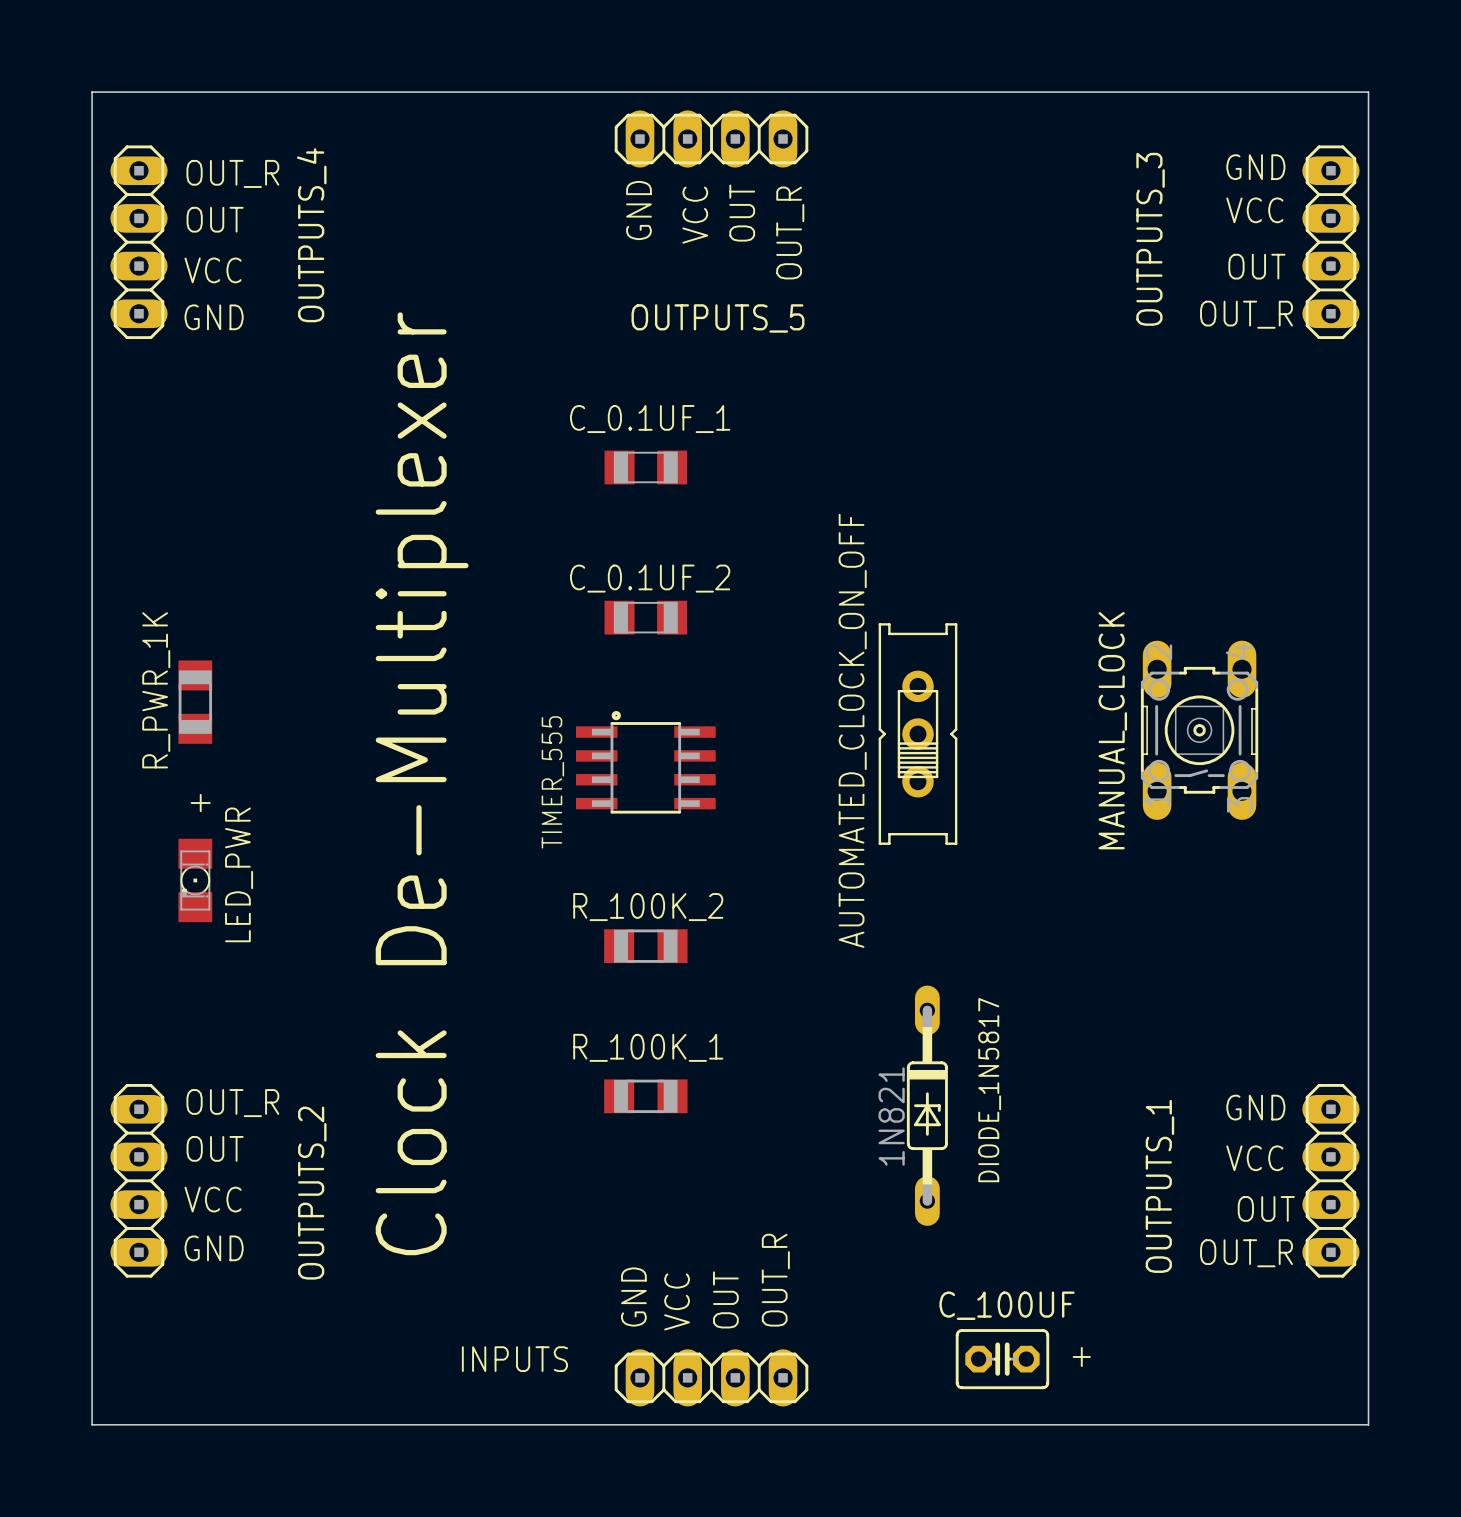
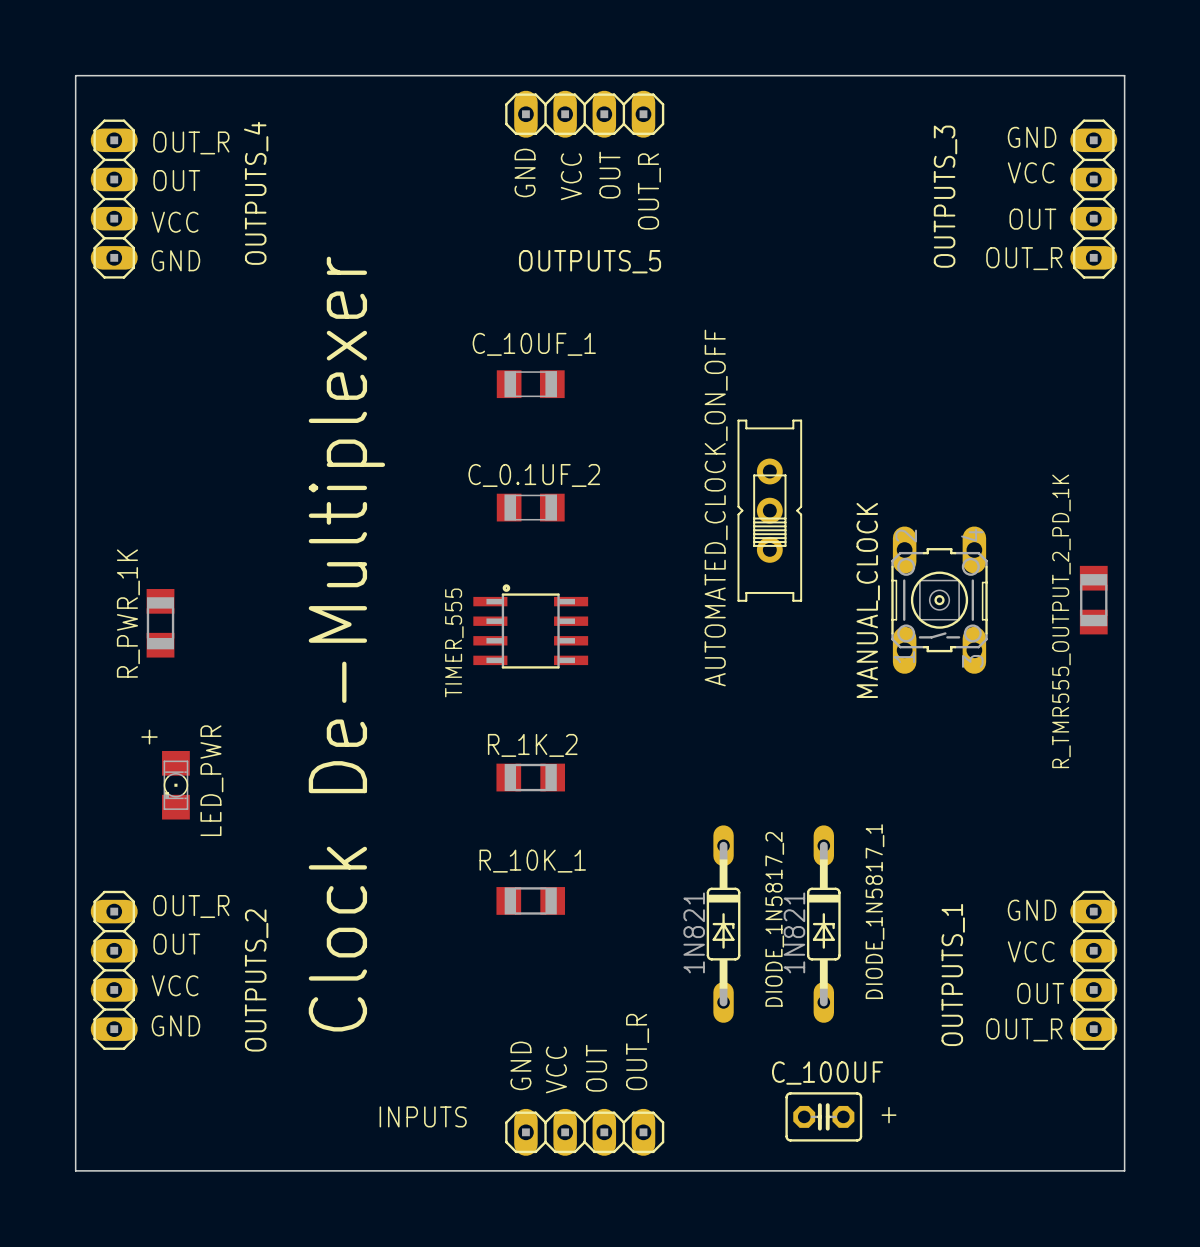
C_0.1UF_1 name: C_0.1UF_1 (650, 419) -> C_10UF_1 (534, 344)
R_PWR_1K position: (195, 702) -> (160, 623)
MANUAL_CLOCK position: (1199, 730) -> (939, 600)
R_TMR555_OUTPUT_2_PD_1K: none -> (1093, 600)
AUTOMATED_CLOCK_ON_OFF position: (918, 734) -> (769, 510)
text position: + (200, 803) -> + (149, 737)
LED_PWR position: (195, 880) -> (175, 785)
R_100K_2 name: R_100K_2 (648, 907) -> R_1K_2 (532, 745)
R_100K_1 name: R_100K_1 (648, 1047) -> R_10K_1 (532, 861)
DIODE_1N5817: 1N821 (927, 1105) -> none
DIODE_1N5817_2: none -> 1N821 (723, 924)
DIODE_1N5817_1: none -> 1N821 (823, 924)

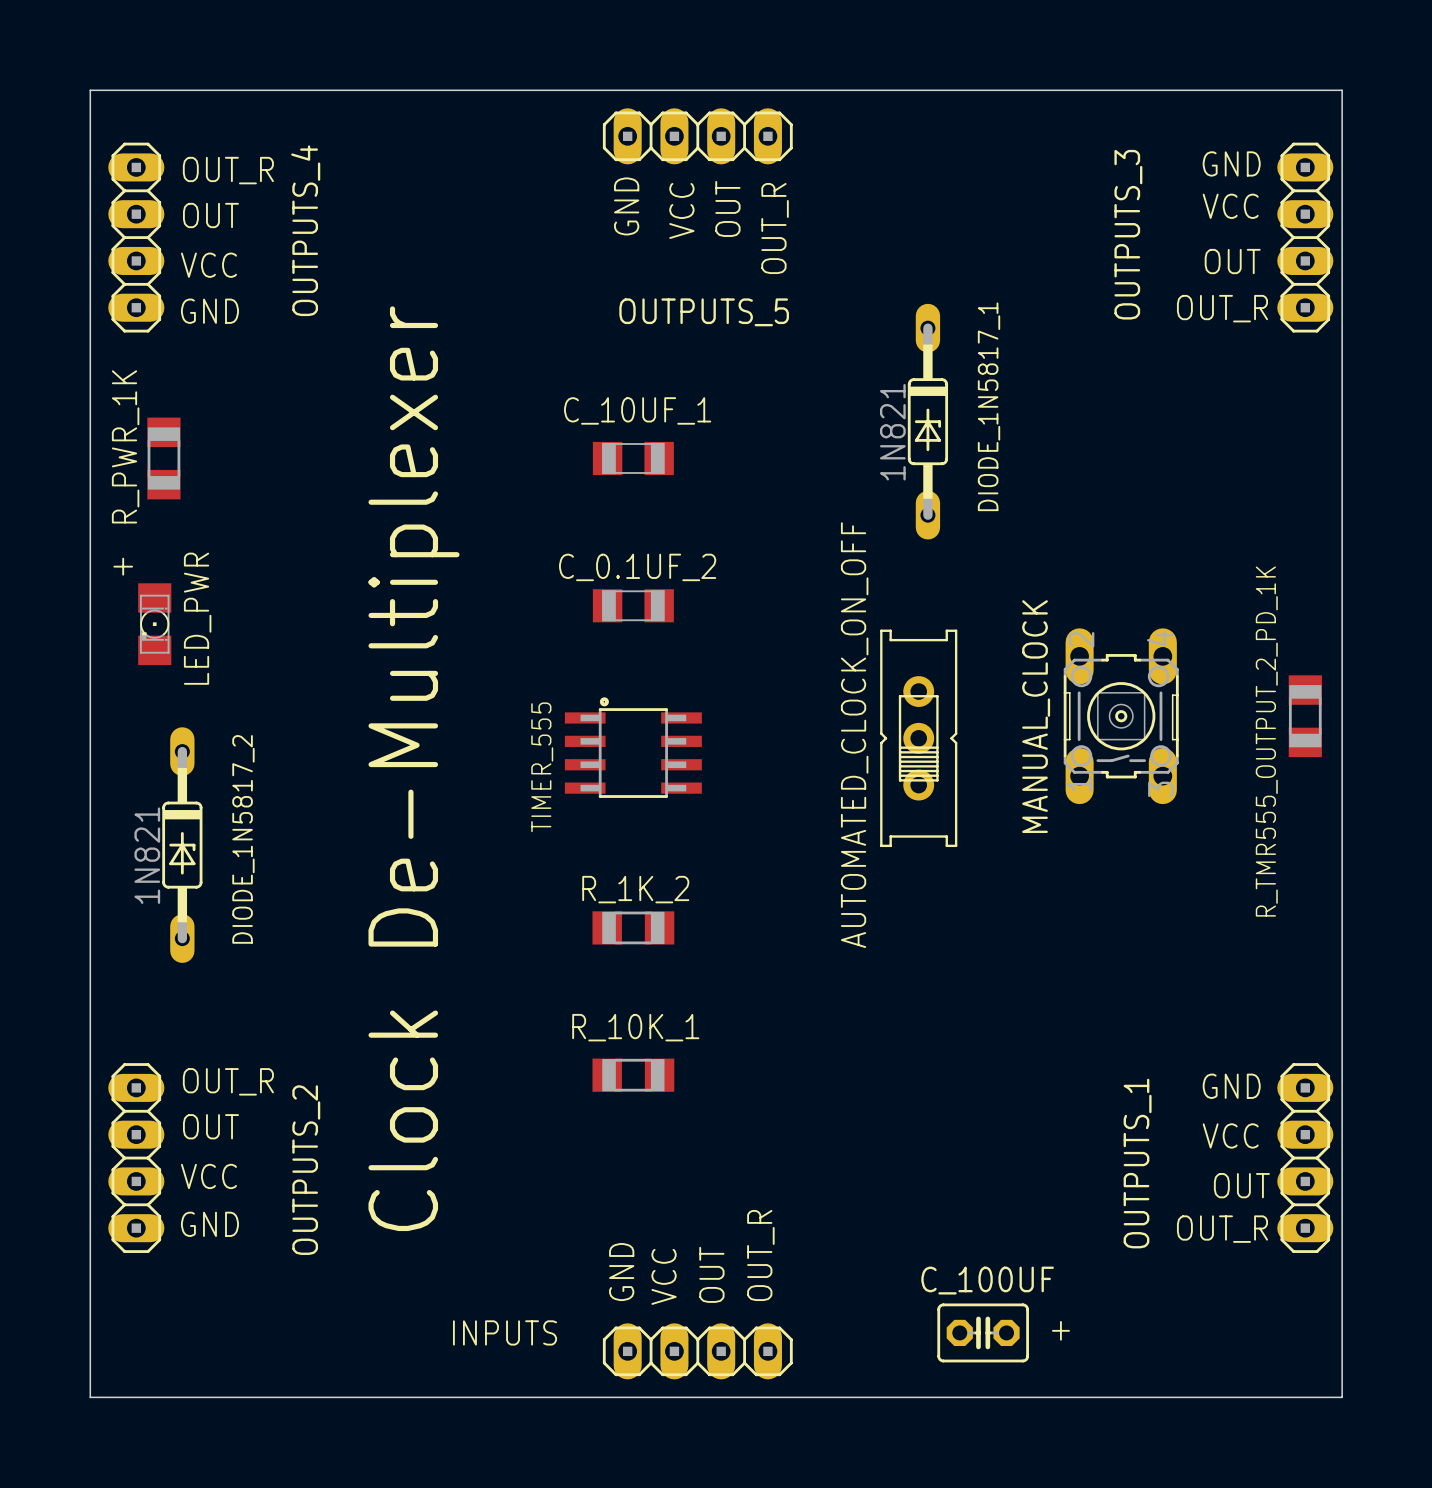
AUTOMATED_CLOCK_ON_OFF position: (769, 510) -> (918, 738)
R_PWR_1K position: (160, 623) -> (163, 458)
text position: + (149, 737) -> + (123, 566)
LED_PWR position: (175, 785) -> (154, 624)
DIODE_1N5817_2 position: (723, 924) -> (182, 845)
DIODE_1N5817_1 position: (823, 924) -> (927, 421)

